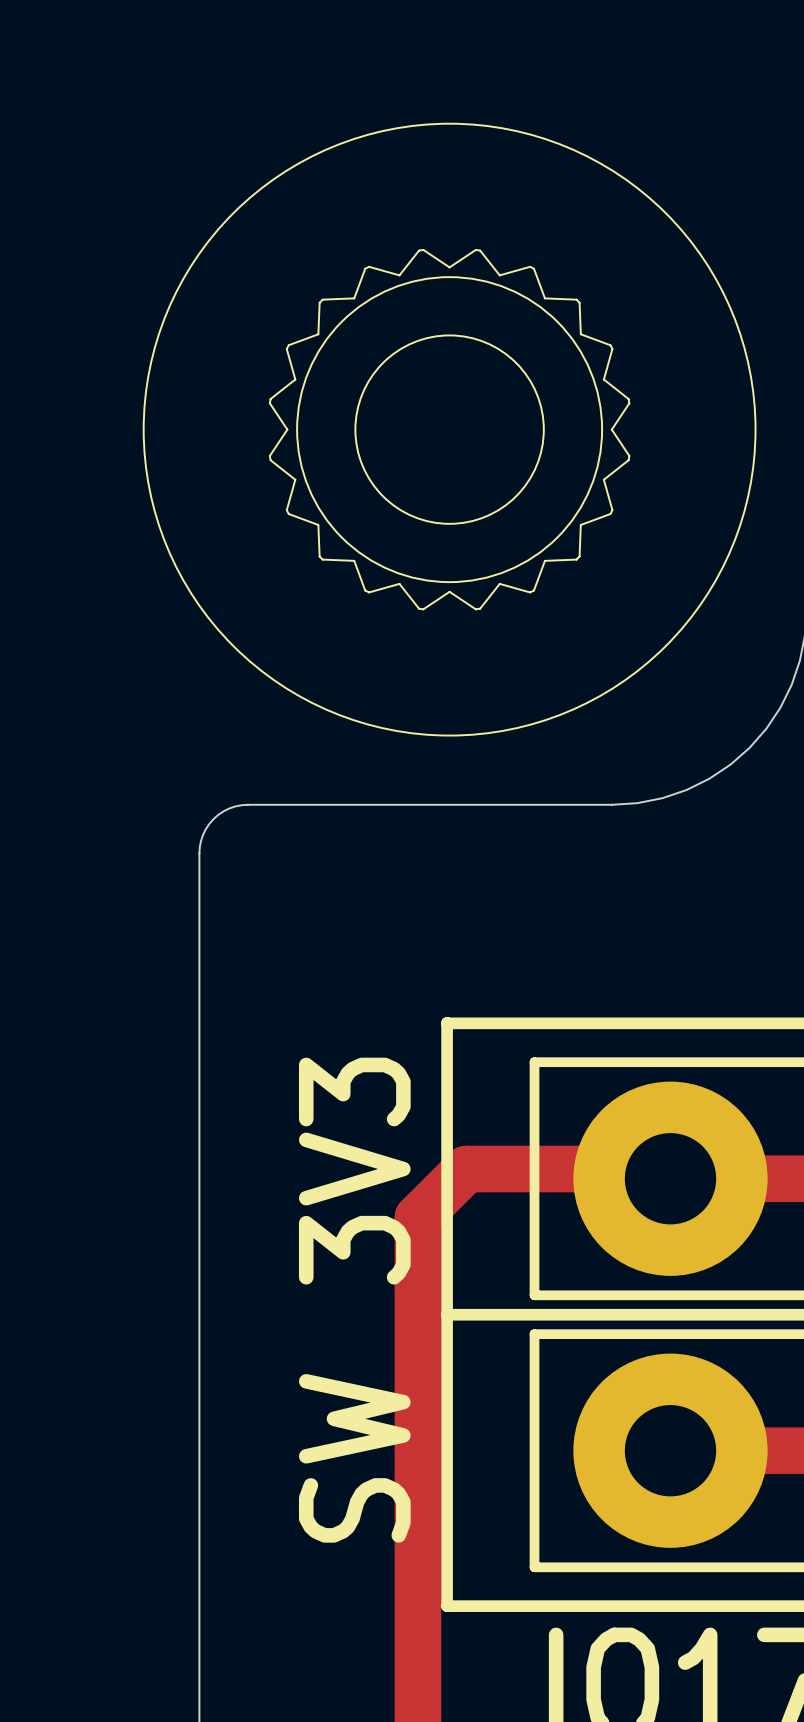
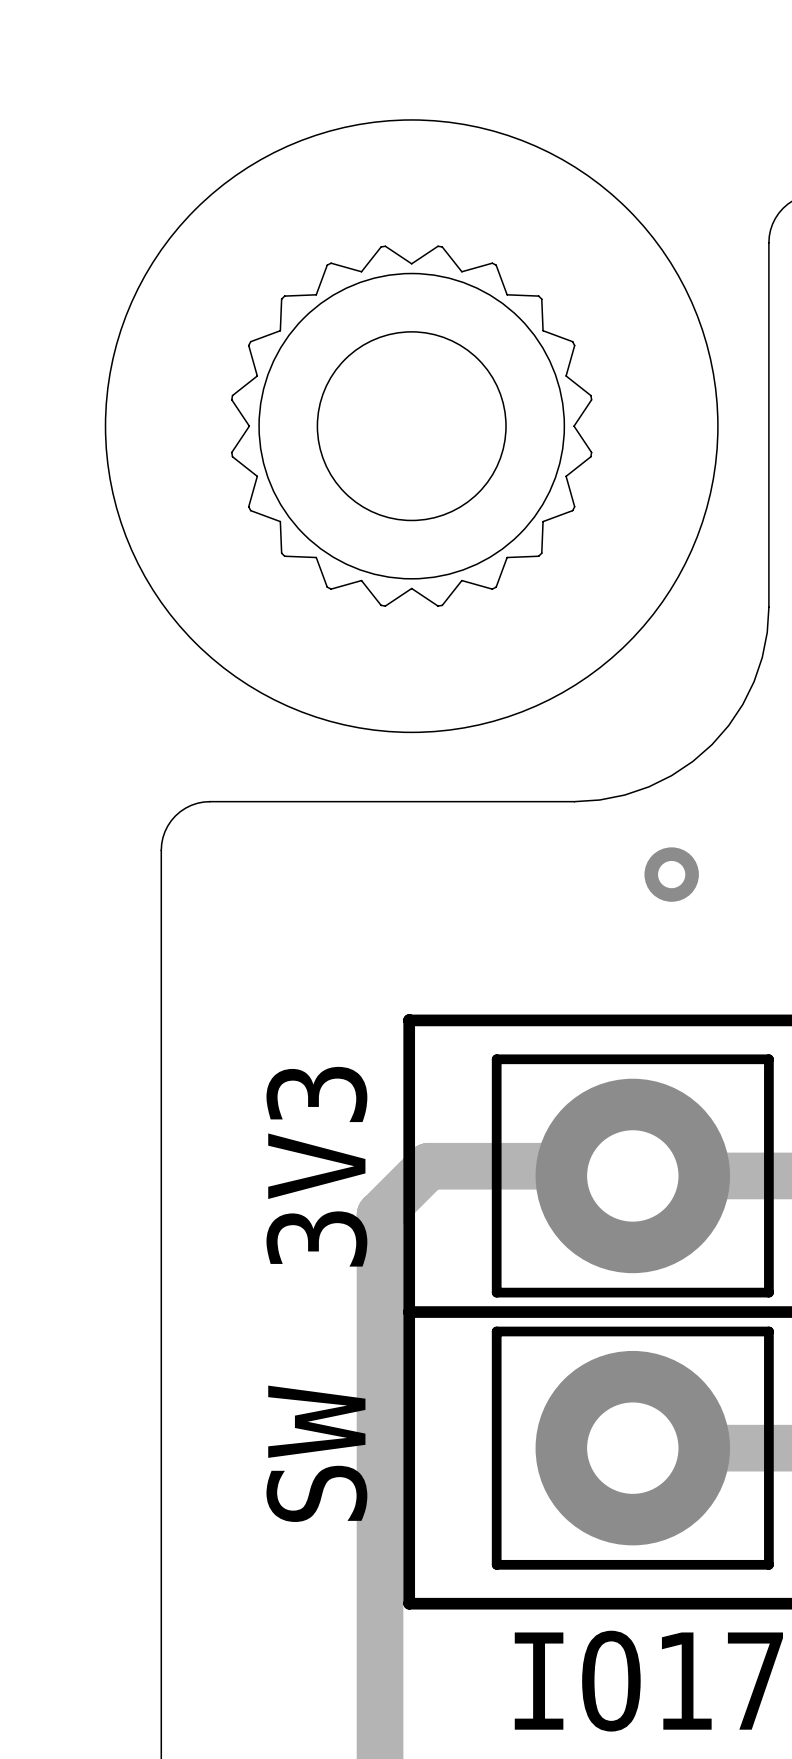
via: none -> (671, 874)

